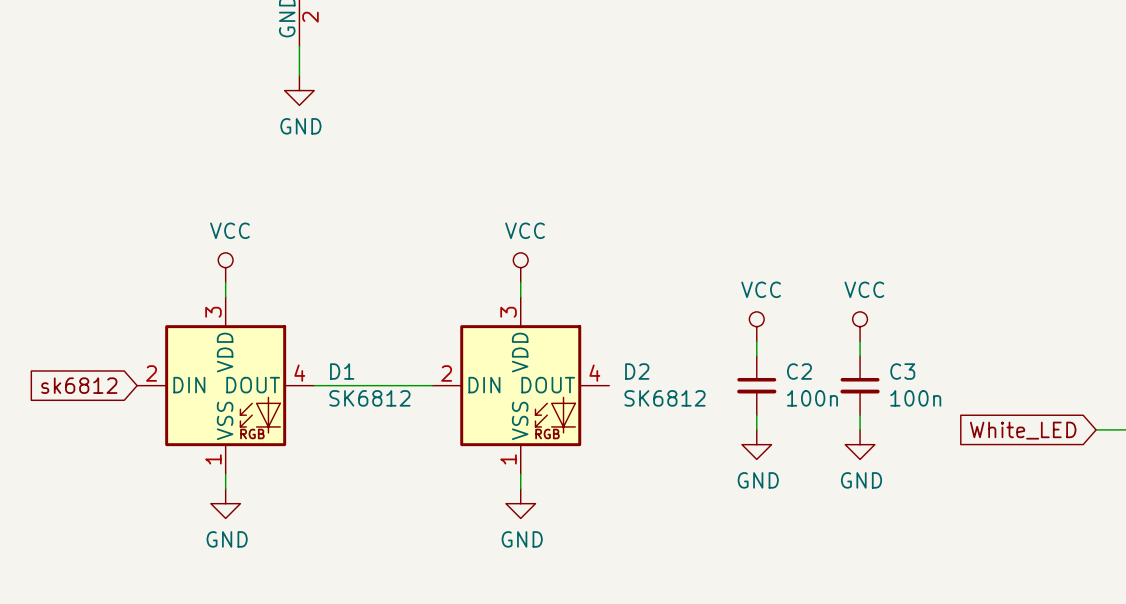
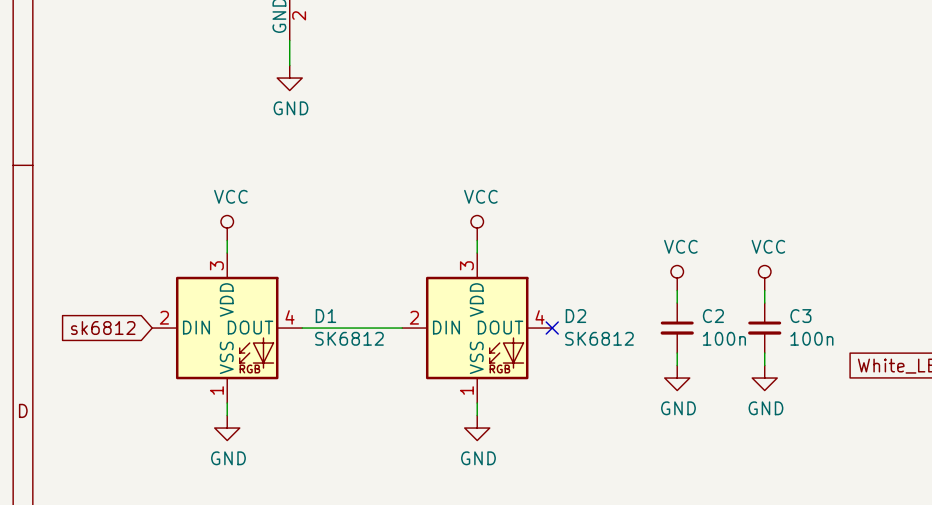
no-connect mark: none -> (552, 328)

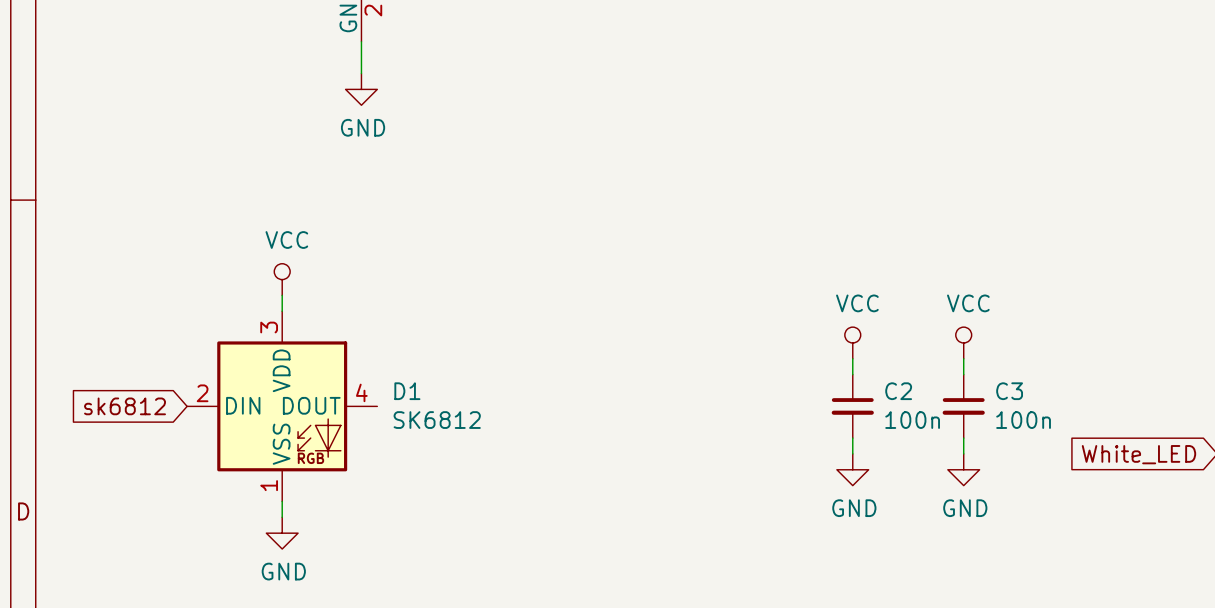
power symbol: VCC (477, 228) -> none
wire: (477, 240) (477, 253) -> none
wire: (302, 328) (402, 328) -> none
D2: SK6812 (477, 328) -> none
no-connect mark: (552, 328) -> none
wire: (477, 403) (477, 415) -> none
power symbol: GND (477, 428) -> none

